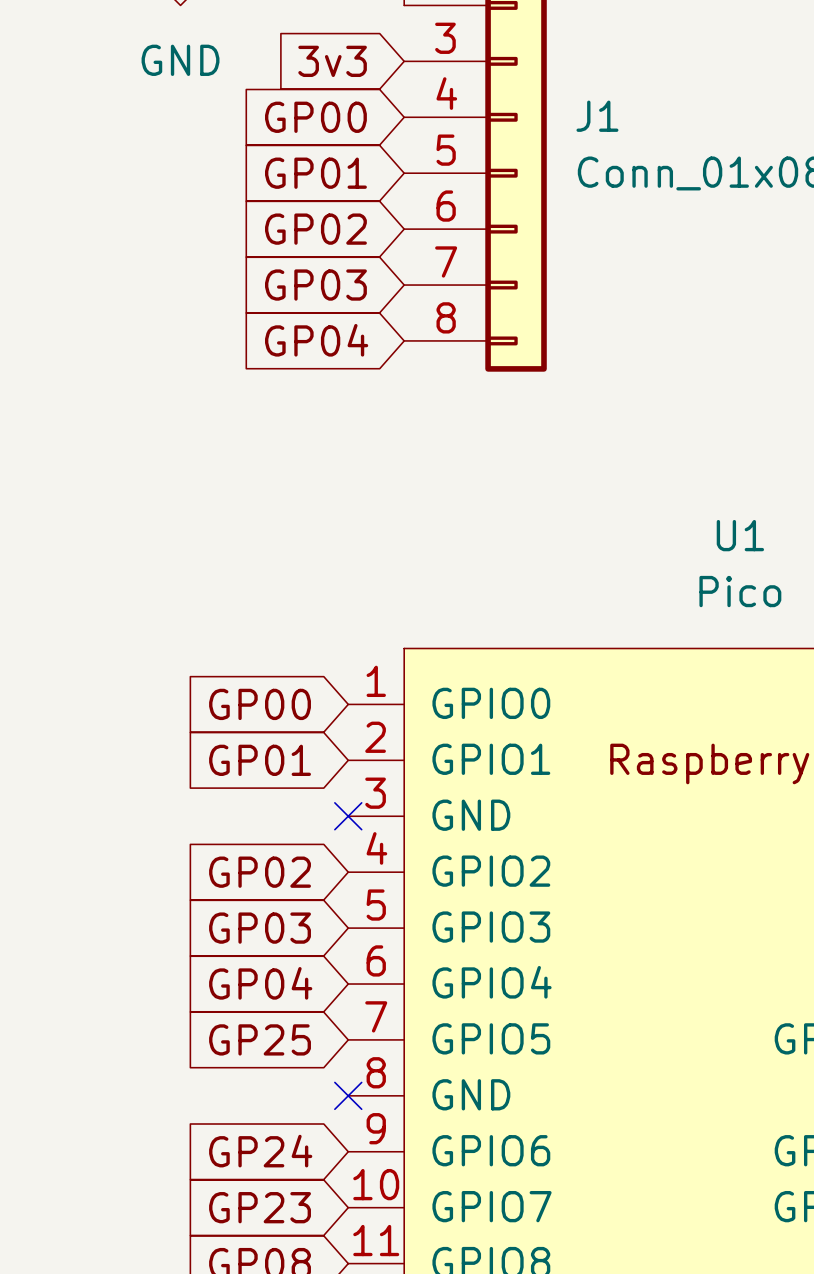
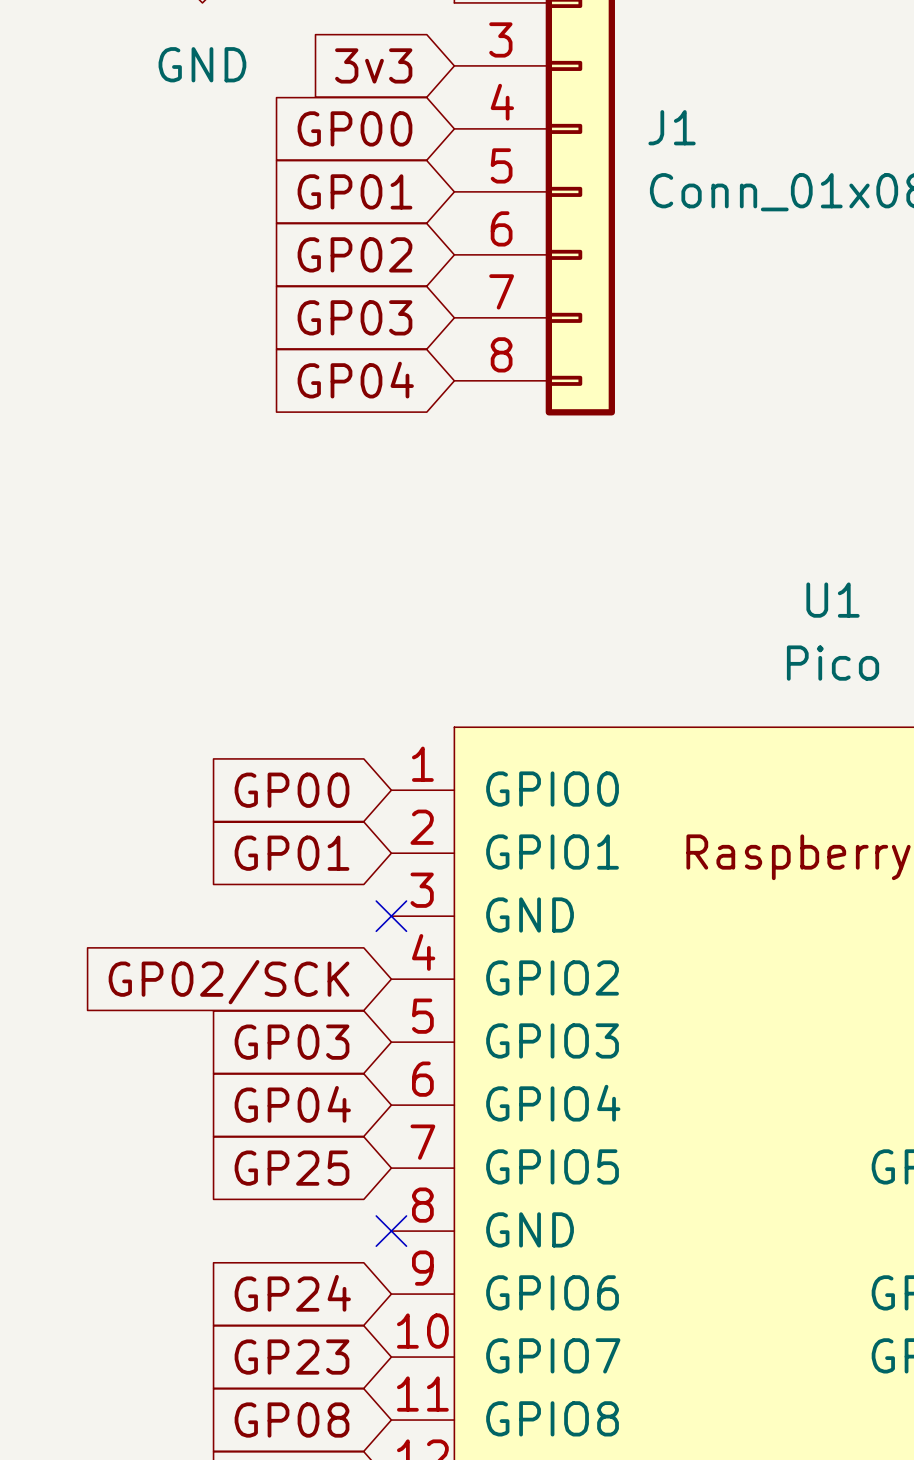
global label: GP02 (260, 872) -> GP02/SCK (229, 982)

